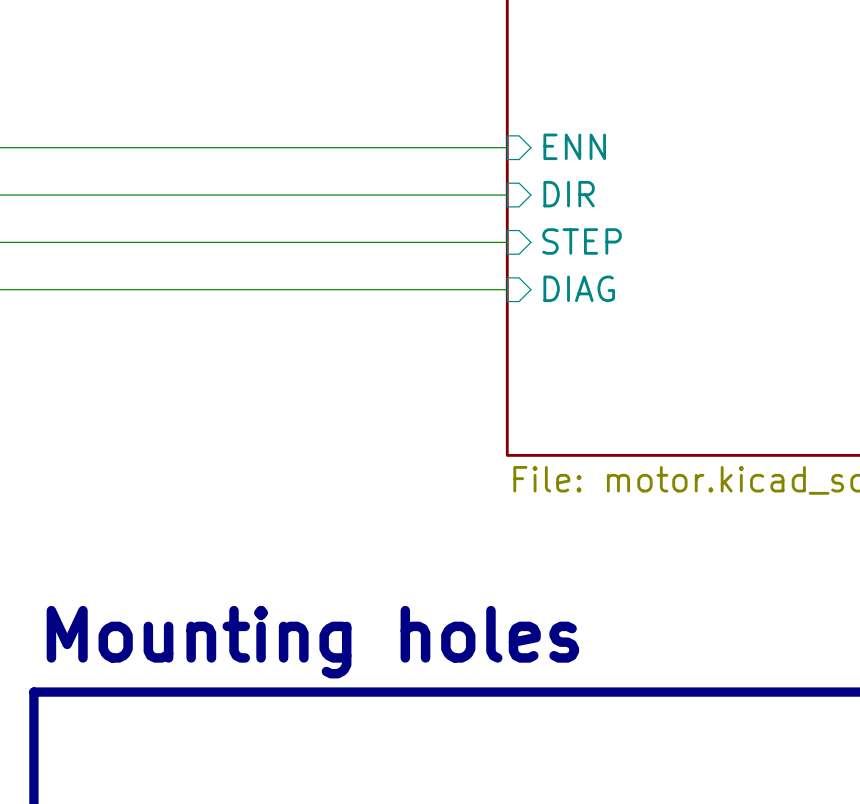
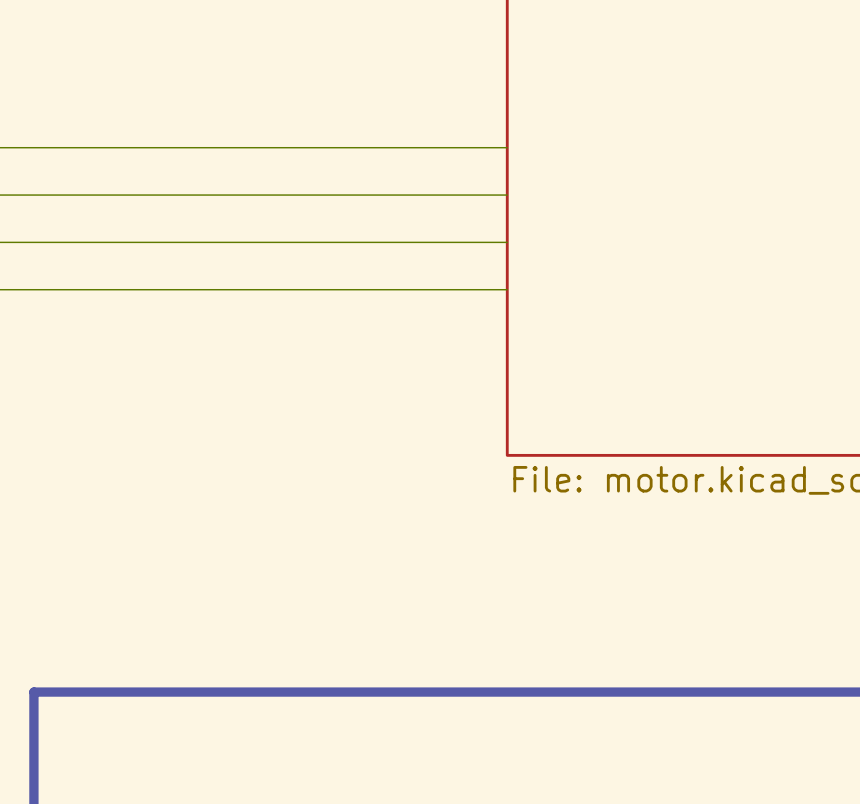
sheet pin: ENN (574, 146) -> none
sheet pin: DIR (569, 194) -> none
sheet pin: STEP (582, 241) -> none
sheet pin: DIAG (579, 288) -> none
text: Mounting holes (312, 642) -> none

